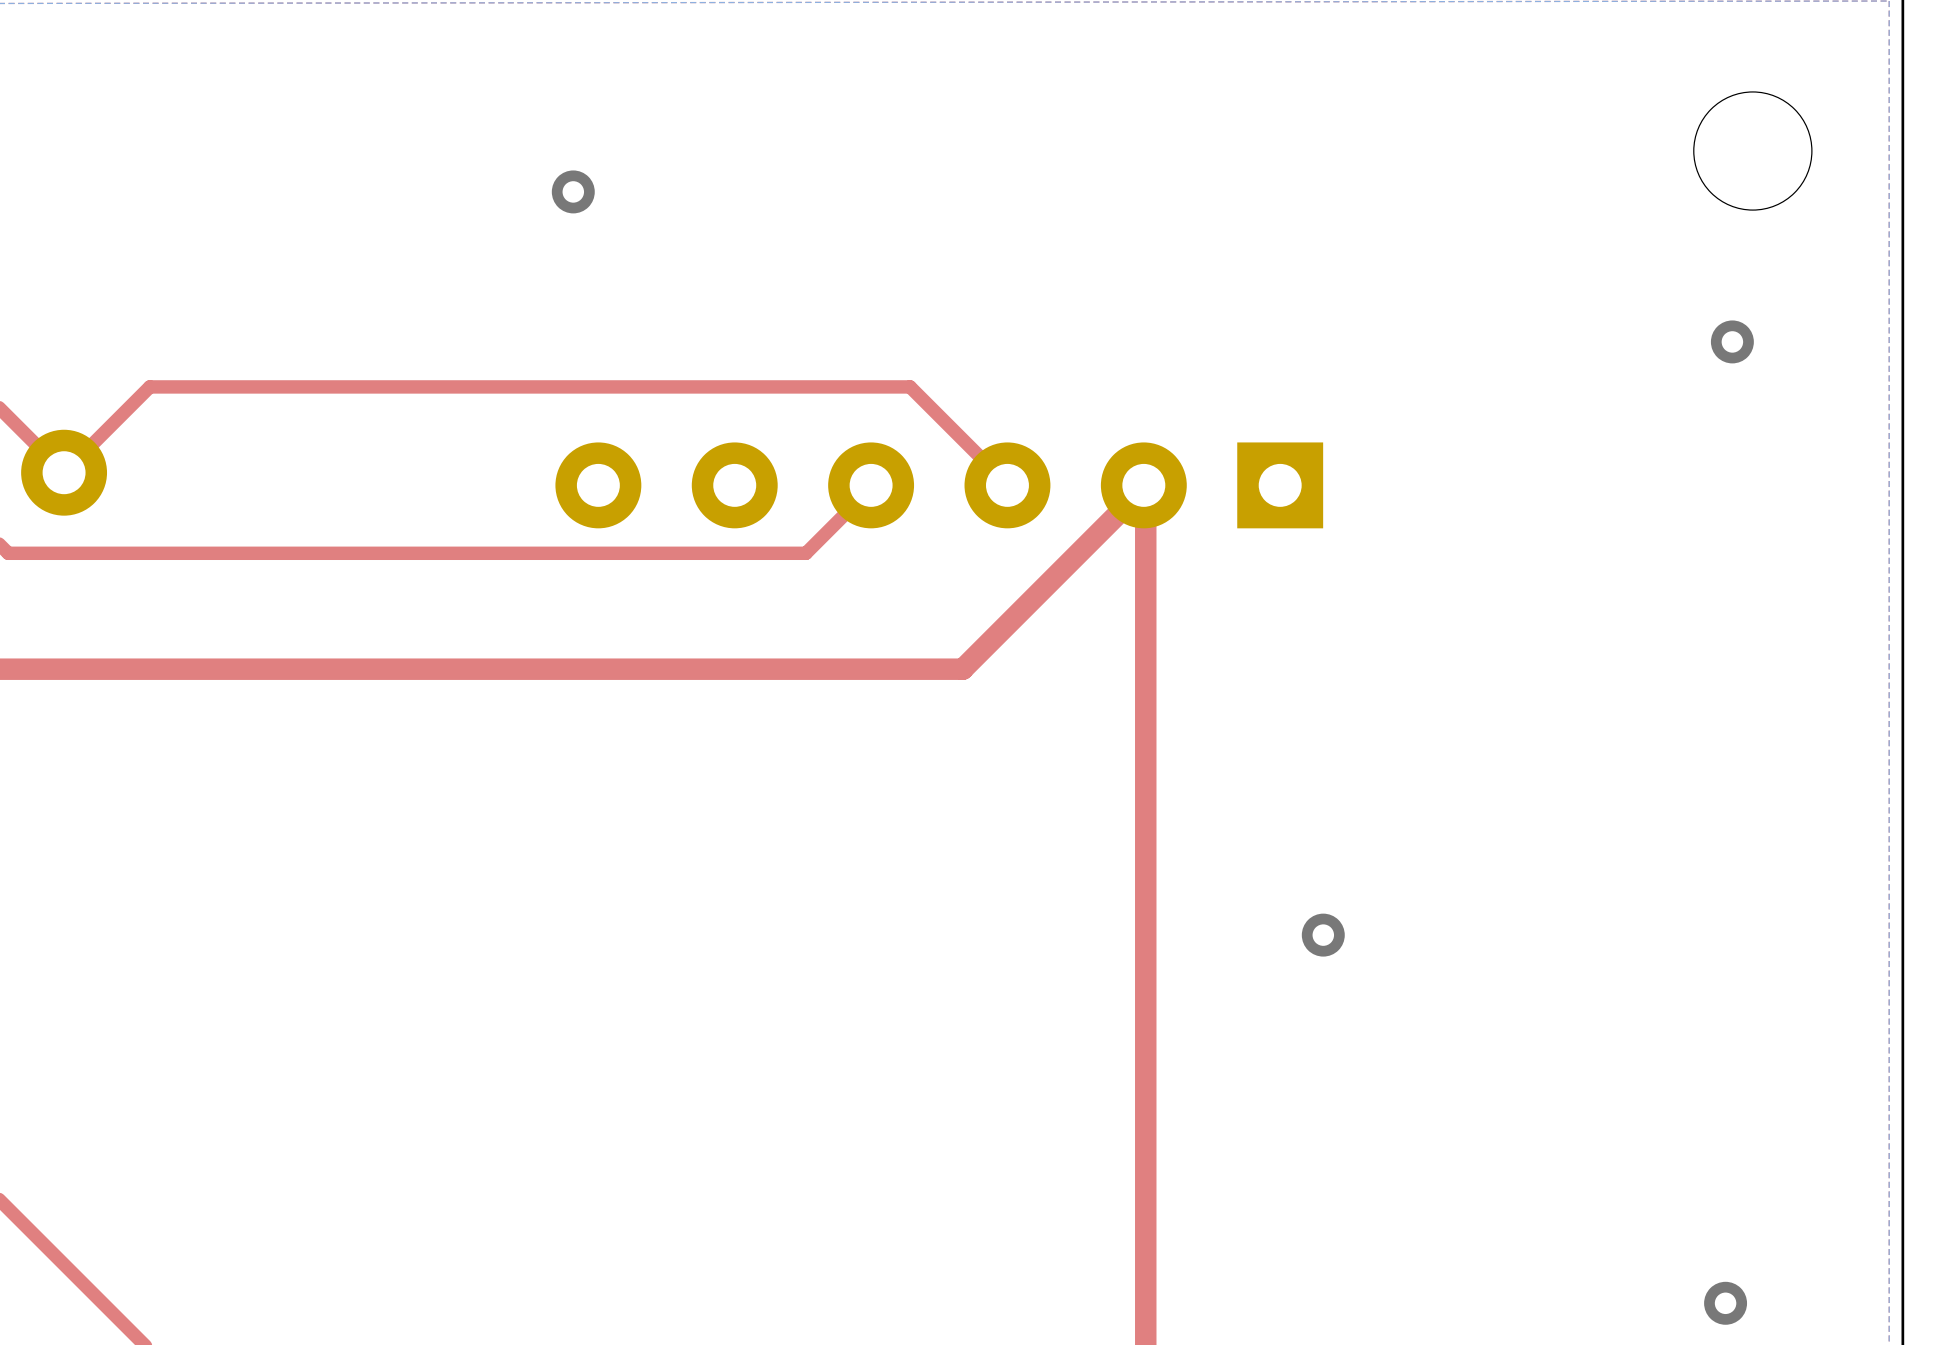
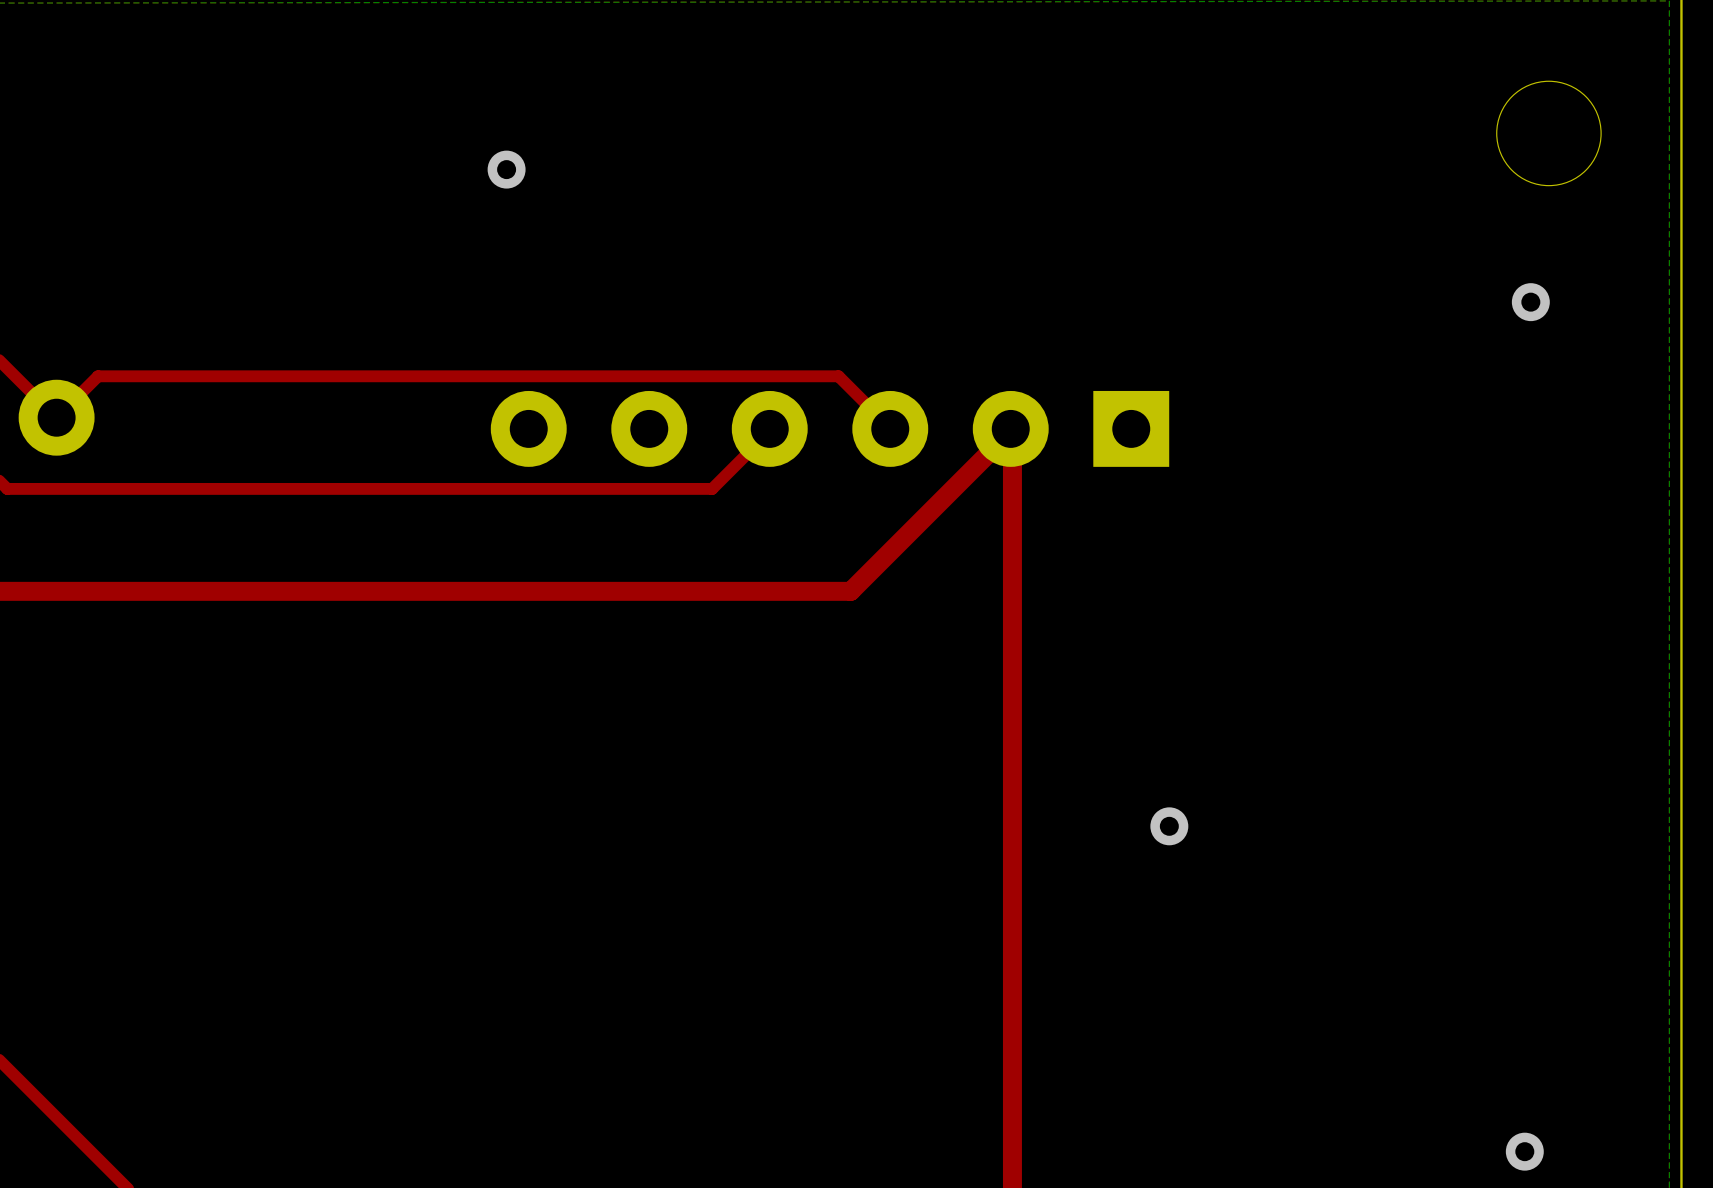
top track: (948, 425) (910, 386) (149, 386) (110, 425) -> (838, 376) (98, 376)

